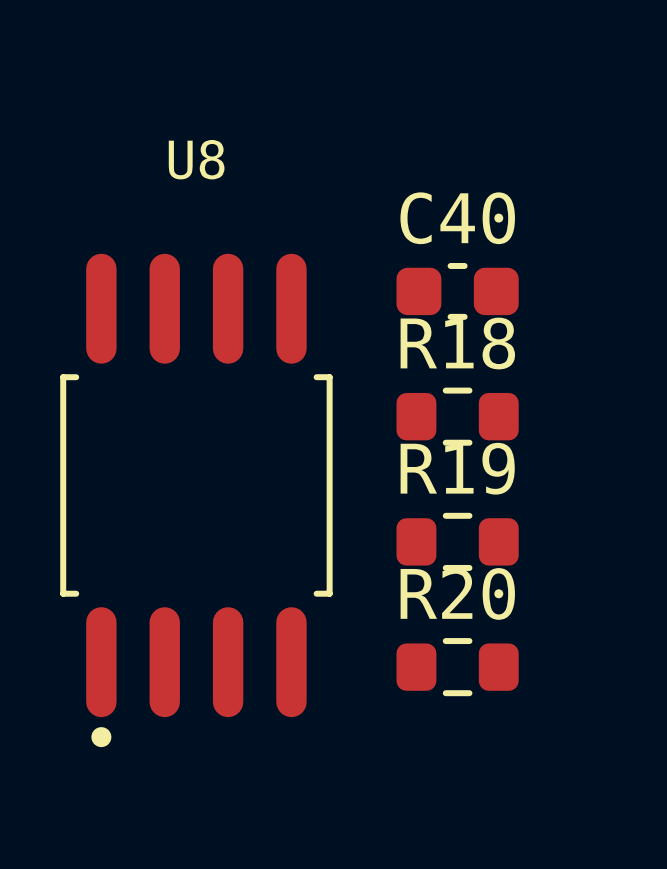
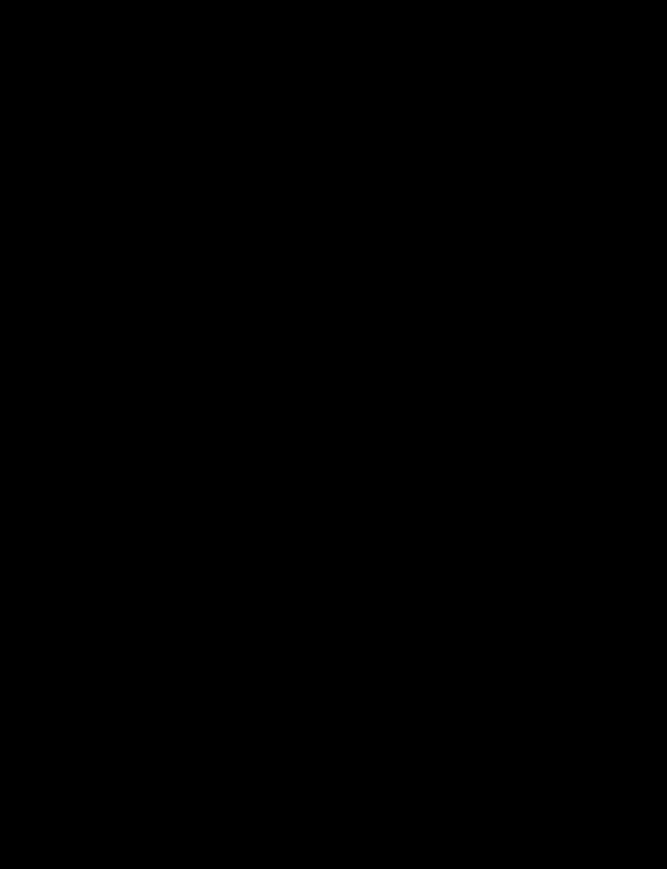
C40: (457, 291) -> none
R18: (457, 416) -> none
U8: (196, 500) -> none
R19: (457, 541) -> none
R20: (457, 667) -> none

